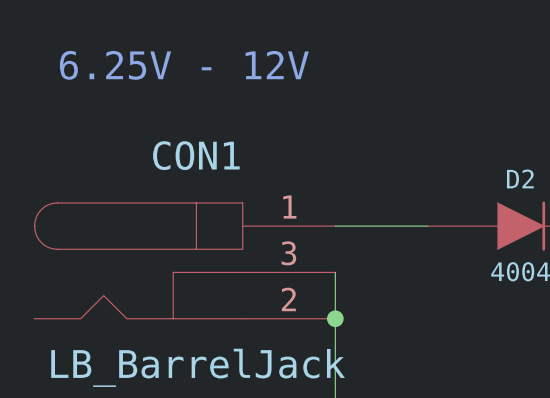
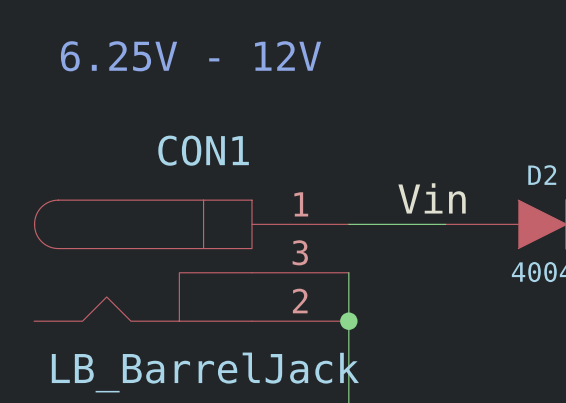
label: none -> Vin (432, 198)

